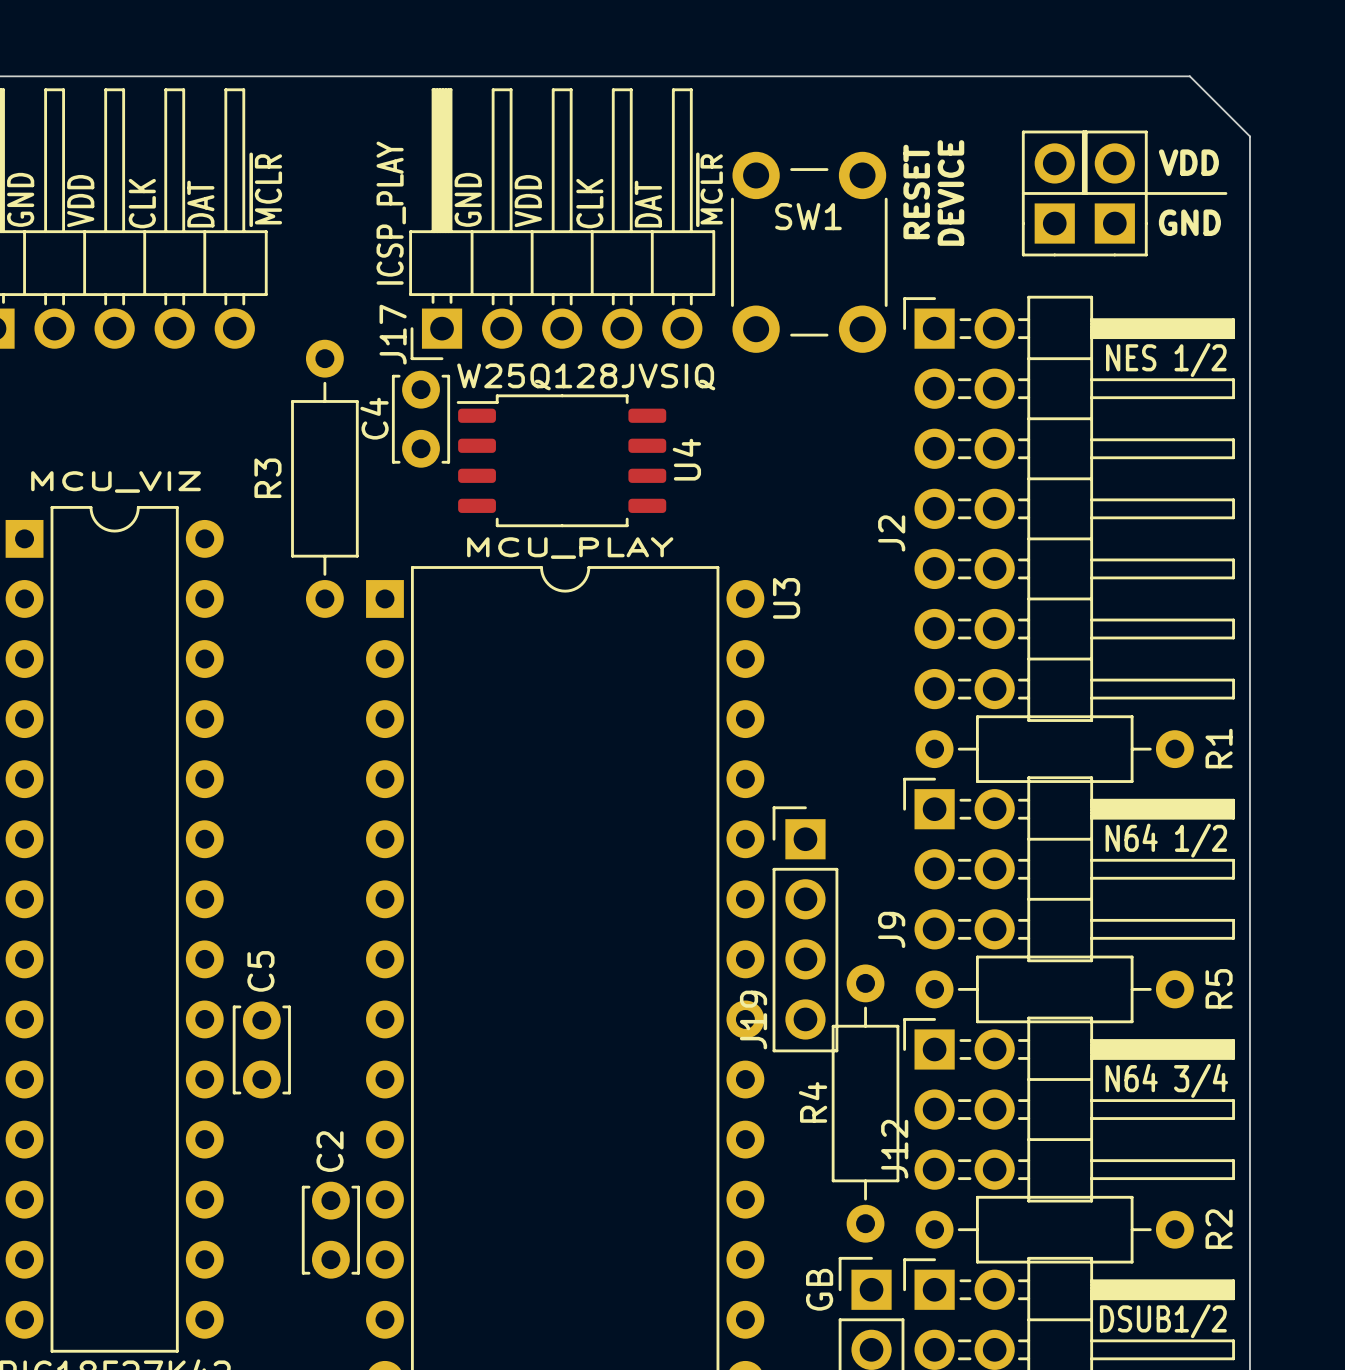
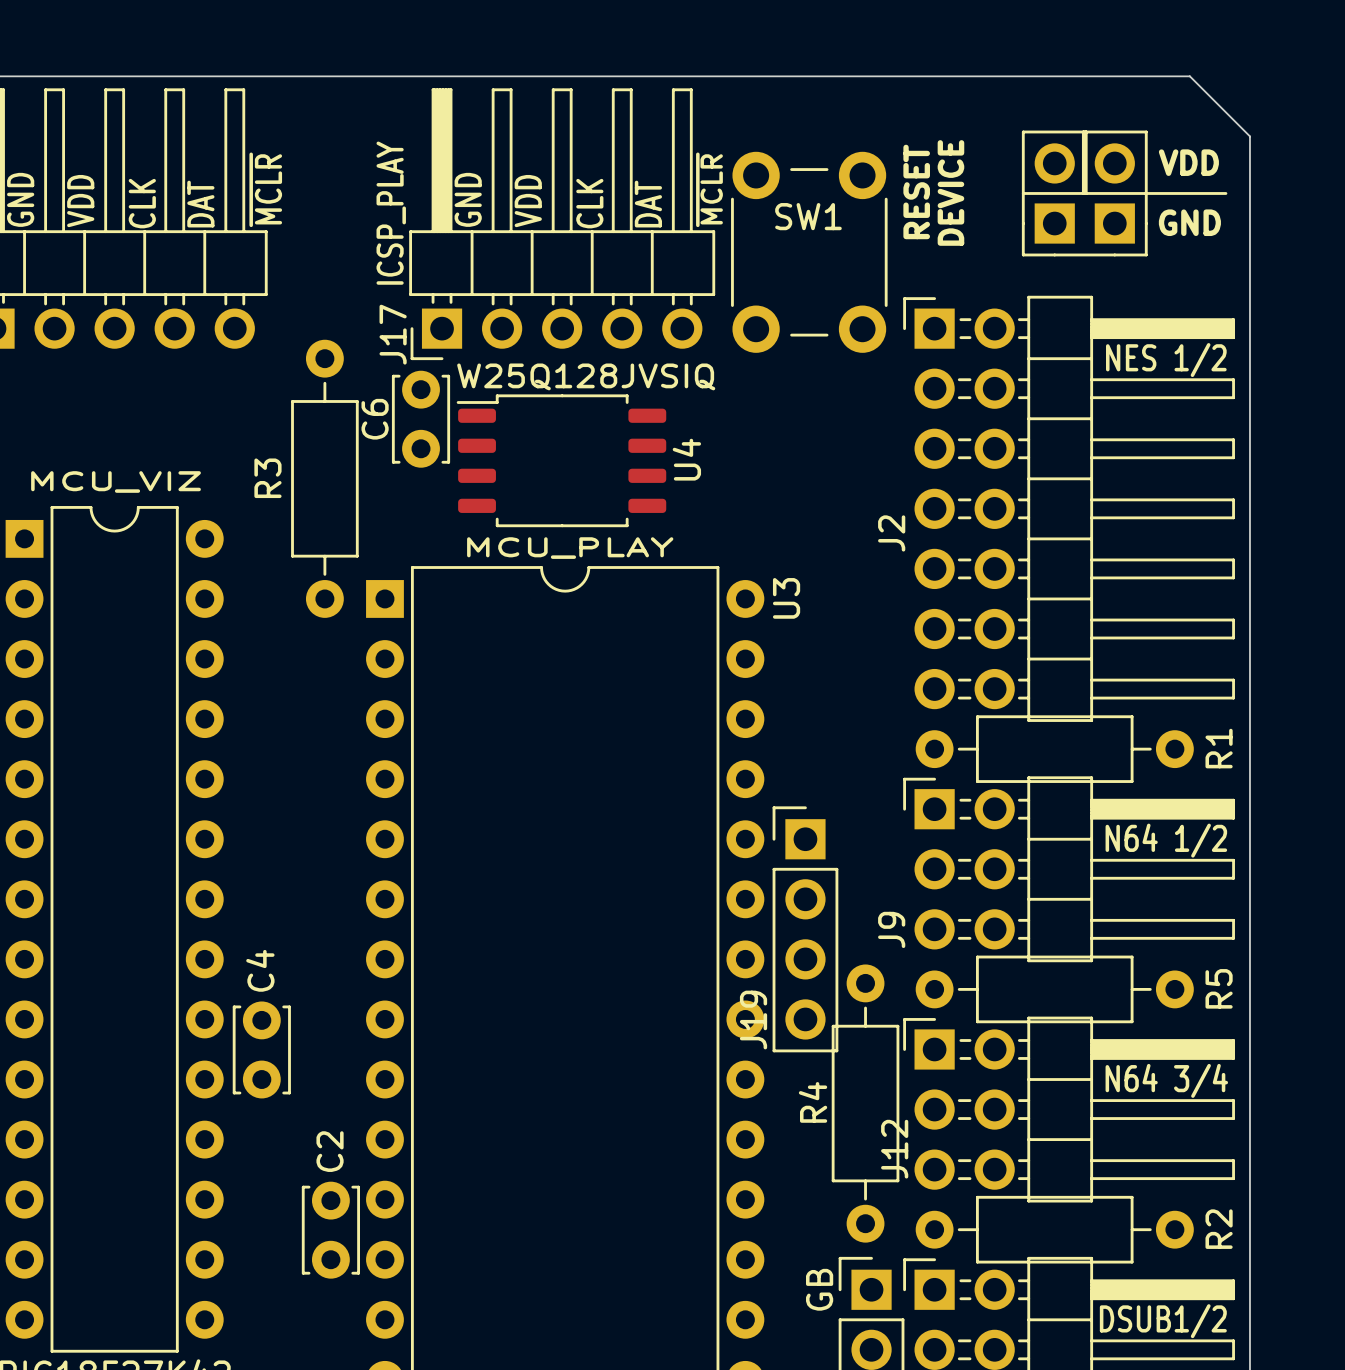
C4 name: C4 (374, 418) -> C6 (375, 419)
C5 name: C5 (260, 971) -> C4 (260, 970)

